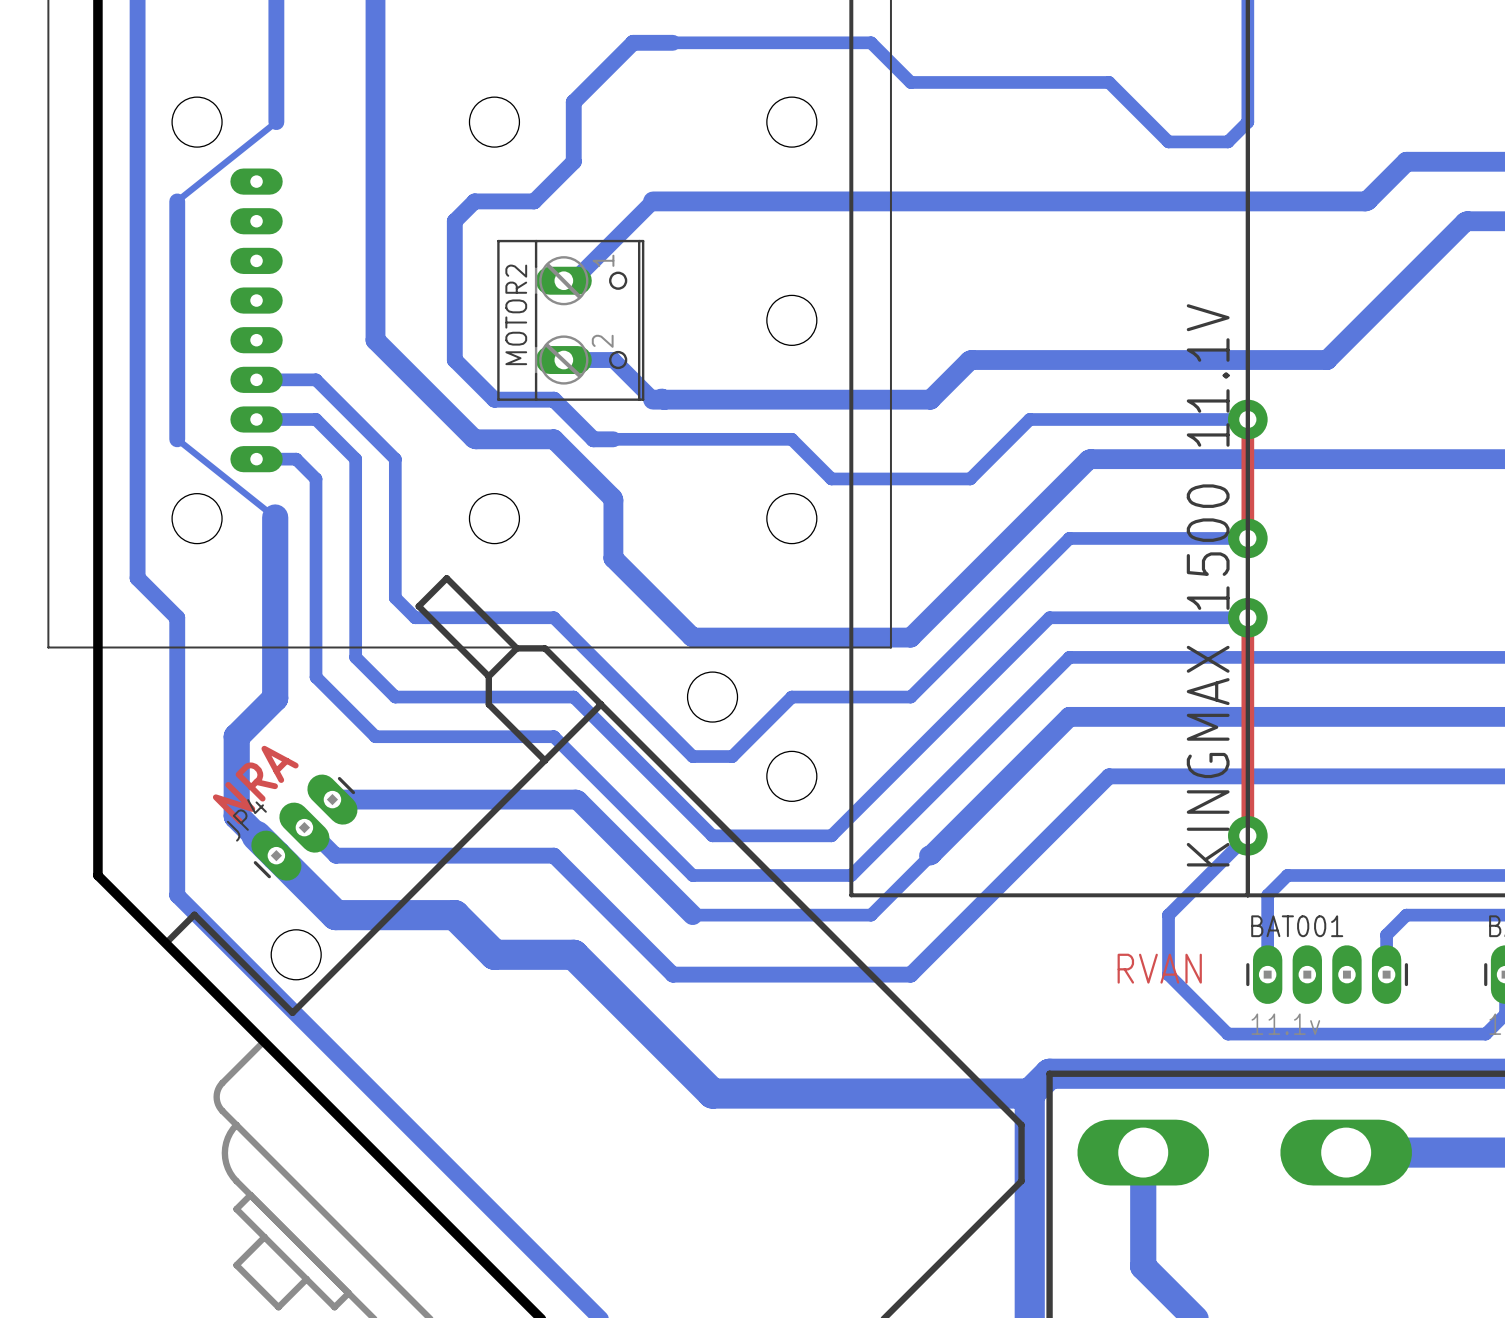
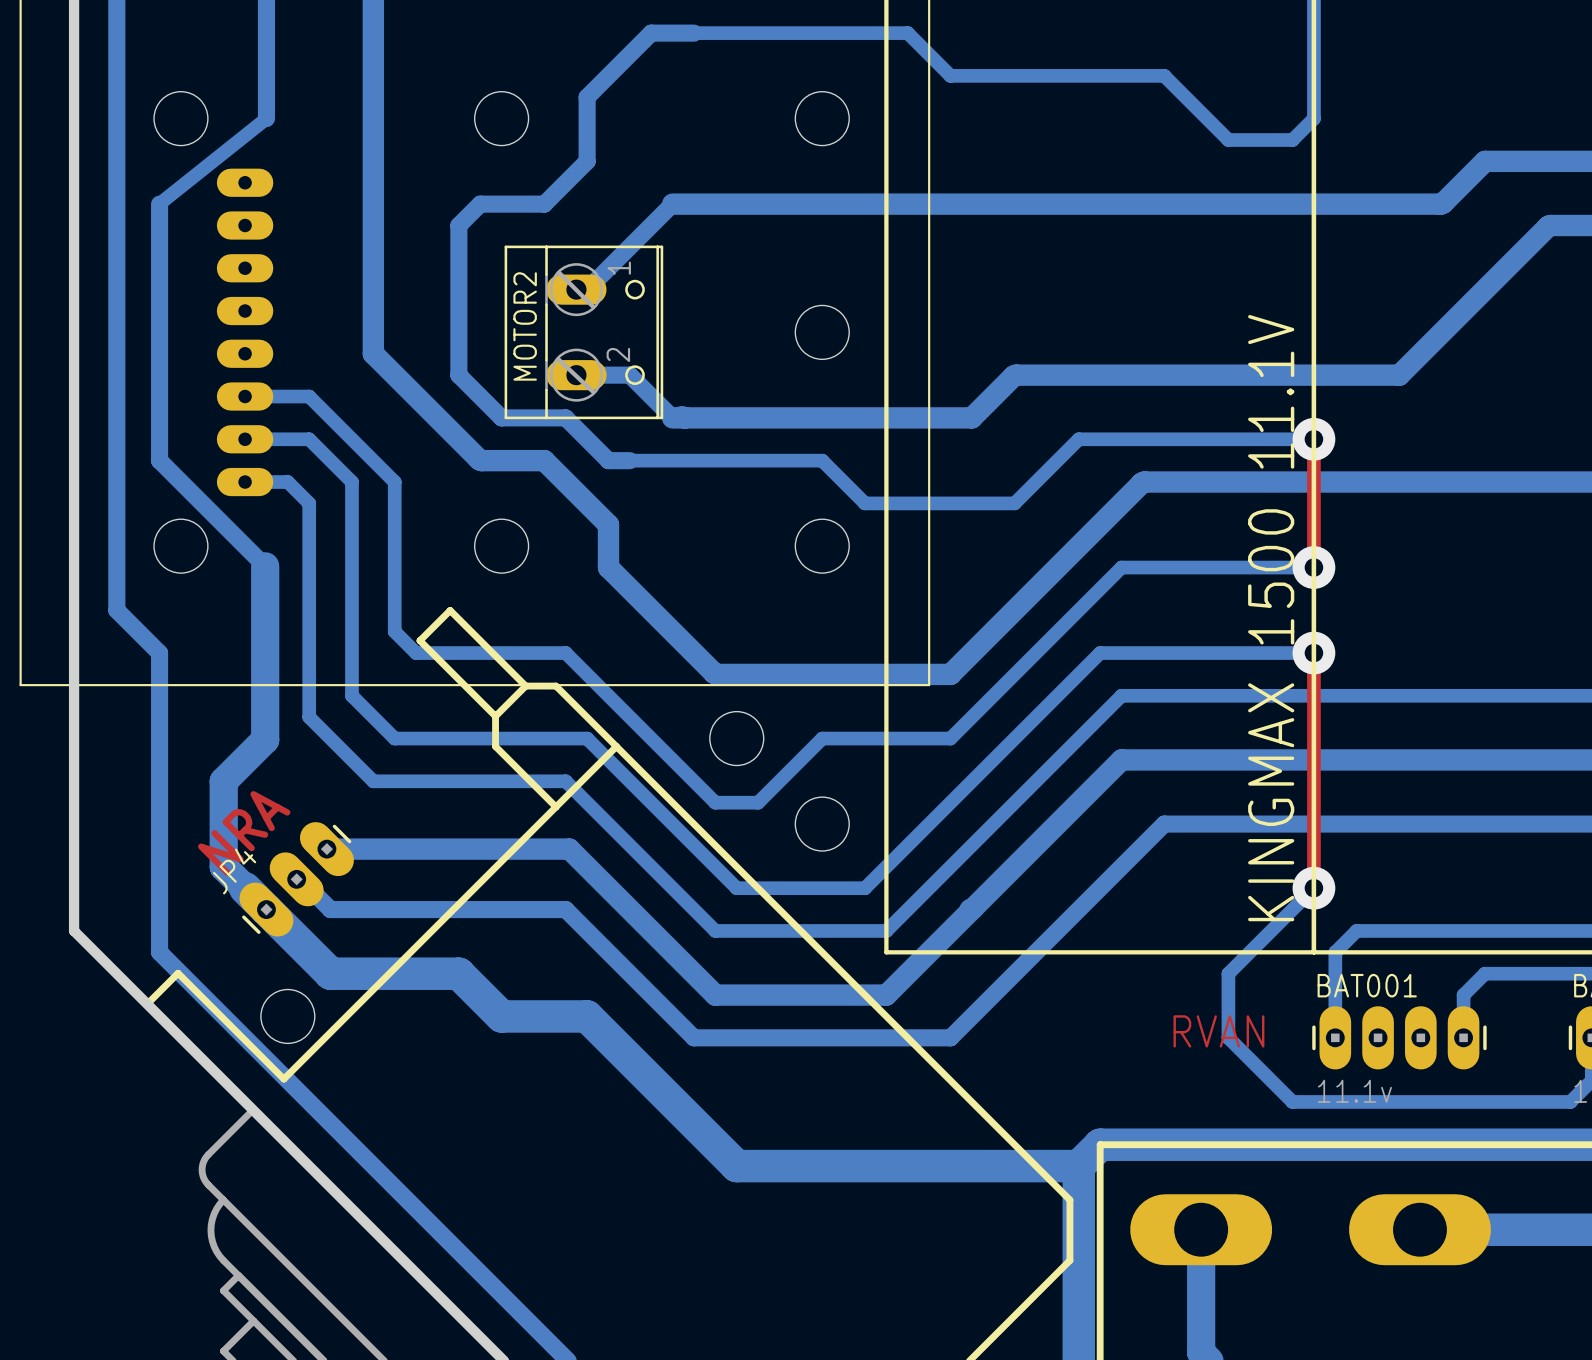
bottom track width: thin (276, 122) (178, 200) -> thick (266, 118) (160, 202)
bottom track: (177, 439) (275, 517) (275, 537) -> (159, 460) (265, 566)
bottom track: (534, 439) (553, 439) (612, 498) (613, 558) -> (544, 460) (608, 524) (608, 567) (629, 588)
bottom track: (557, 799) (577, 800) (692, 915) (871, 915) -> (569, 849) (715, 995) (886, 995) (907, 973)
bottom track width: thin (930, 855) (871, 915) -> thick (971, 909) (907, 973)

